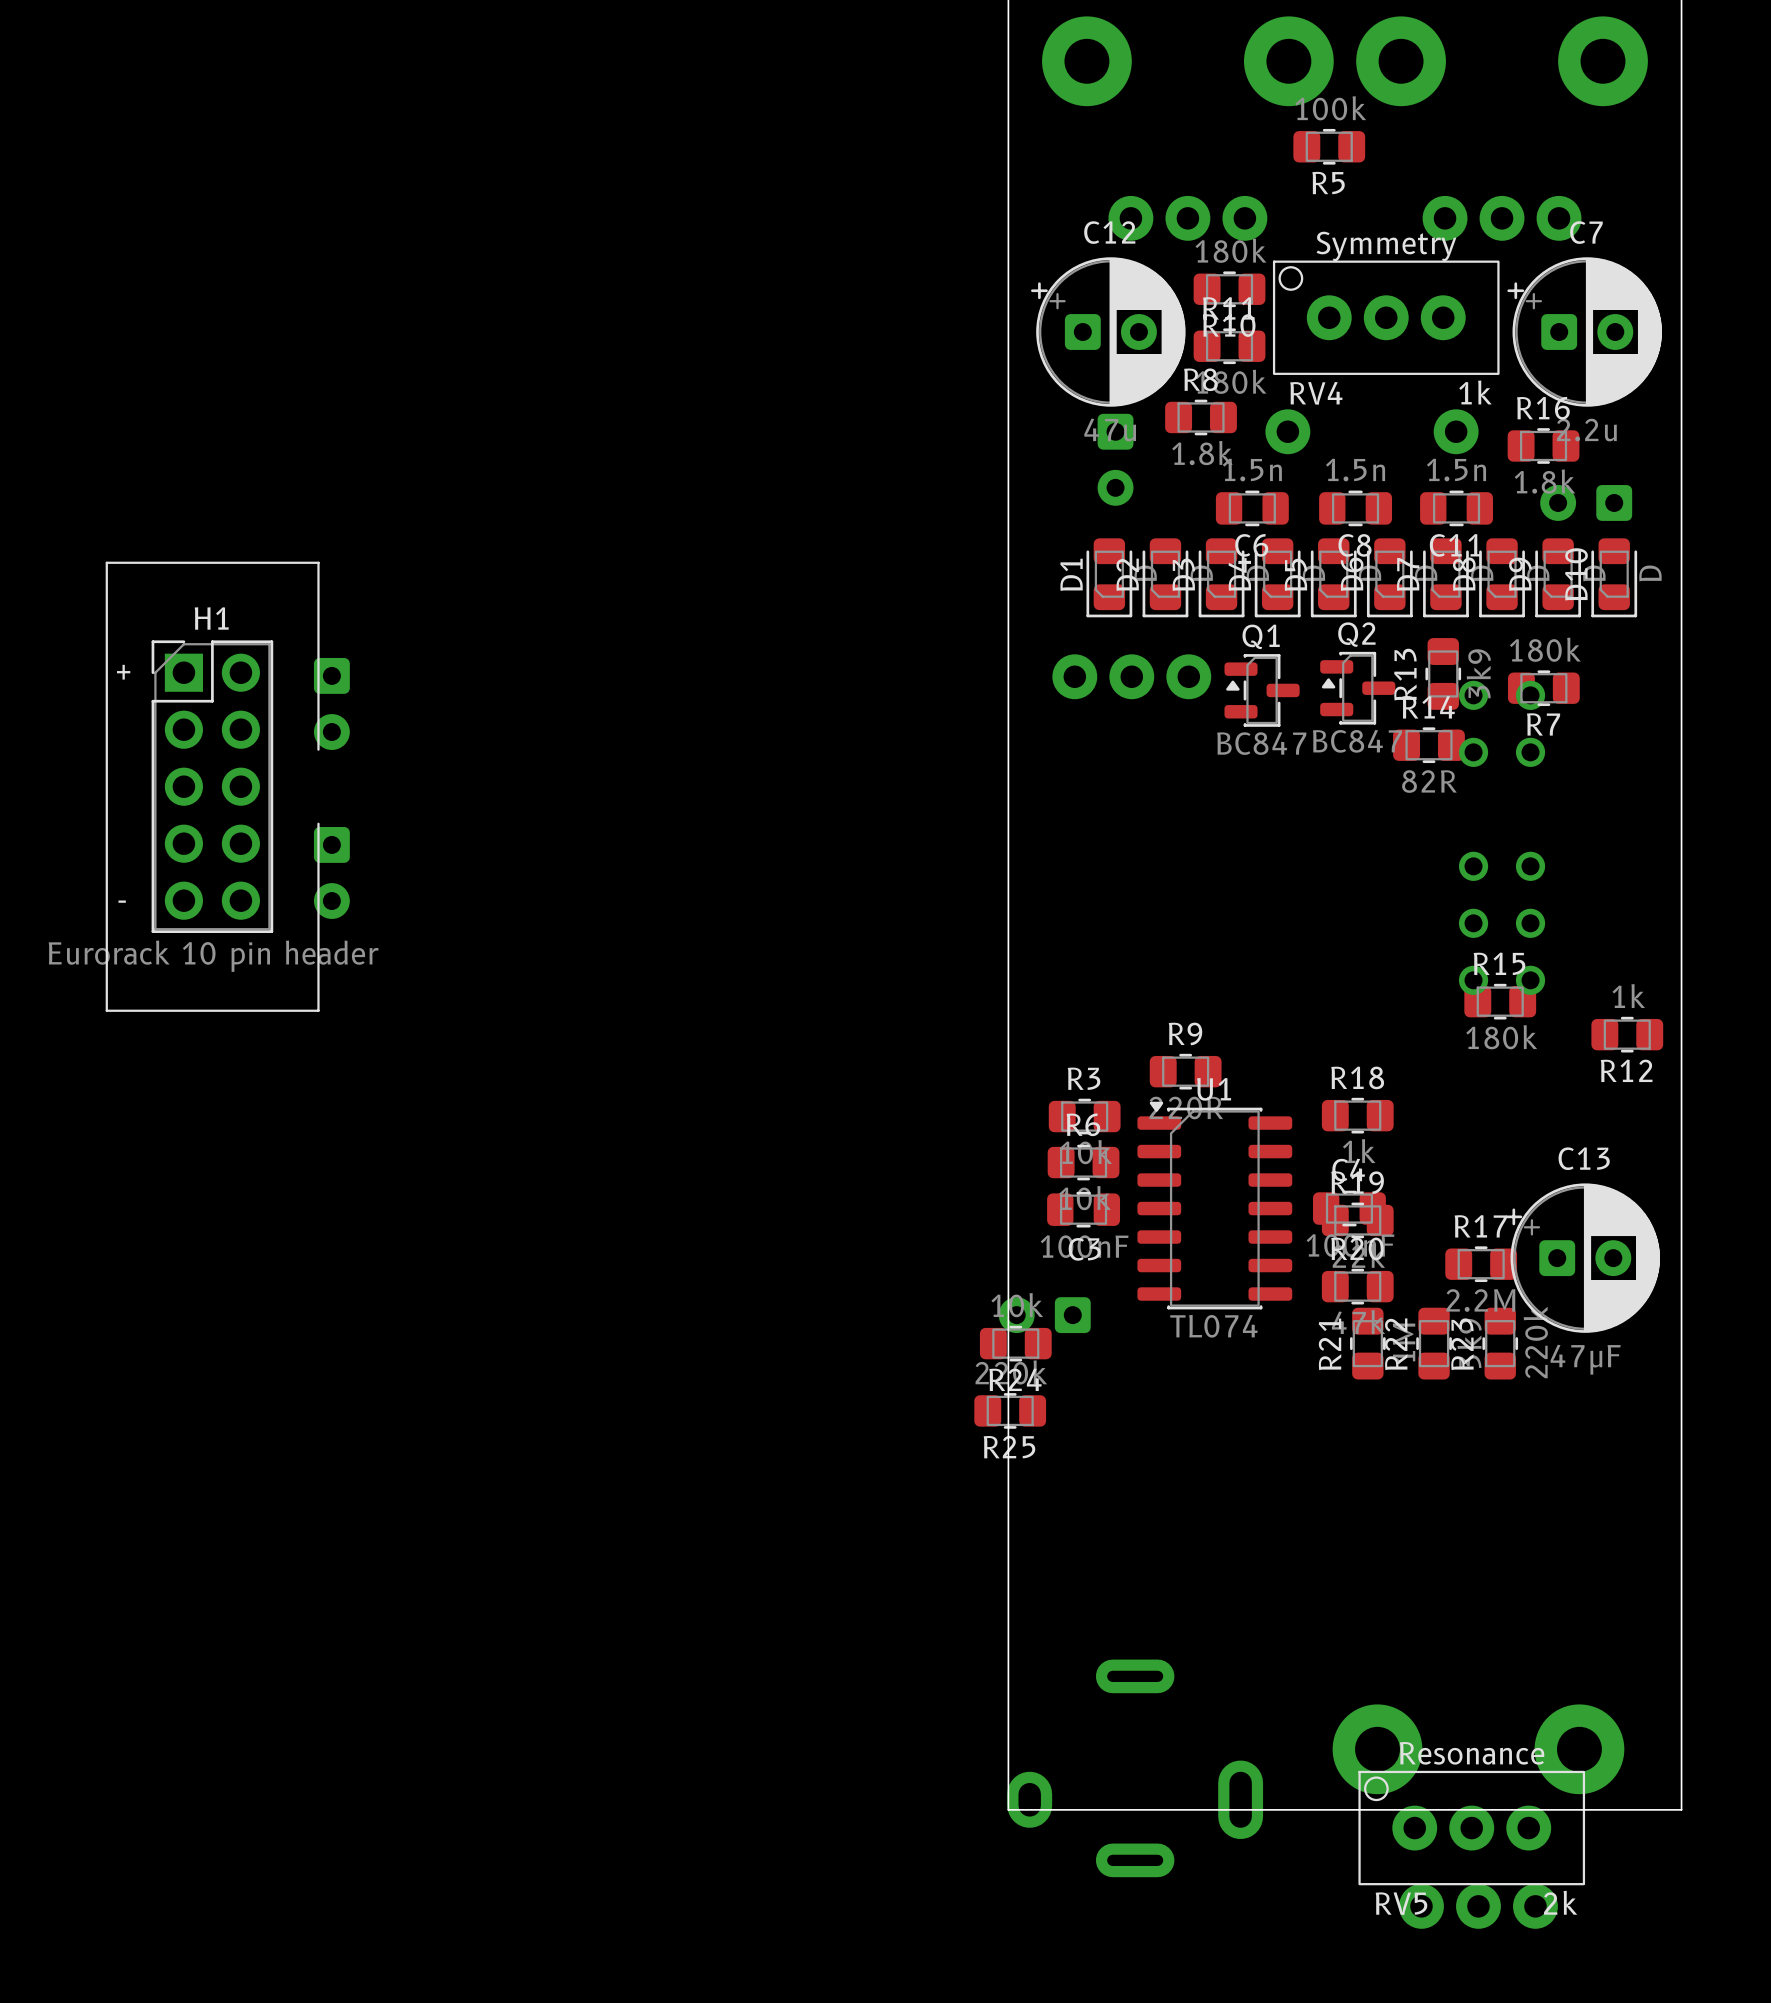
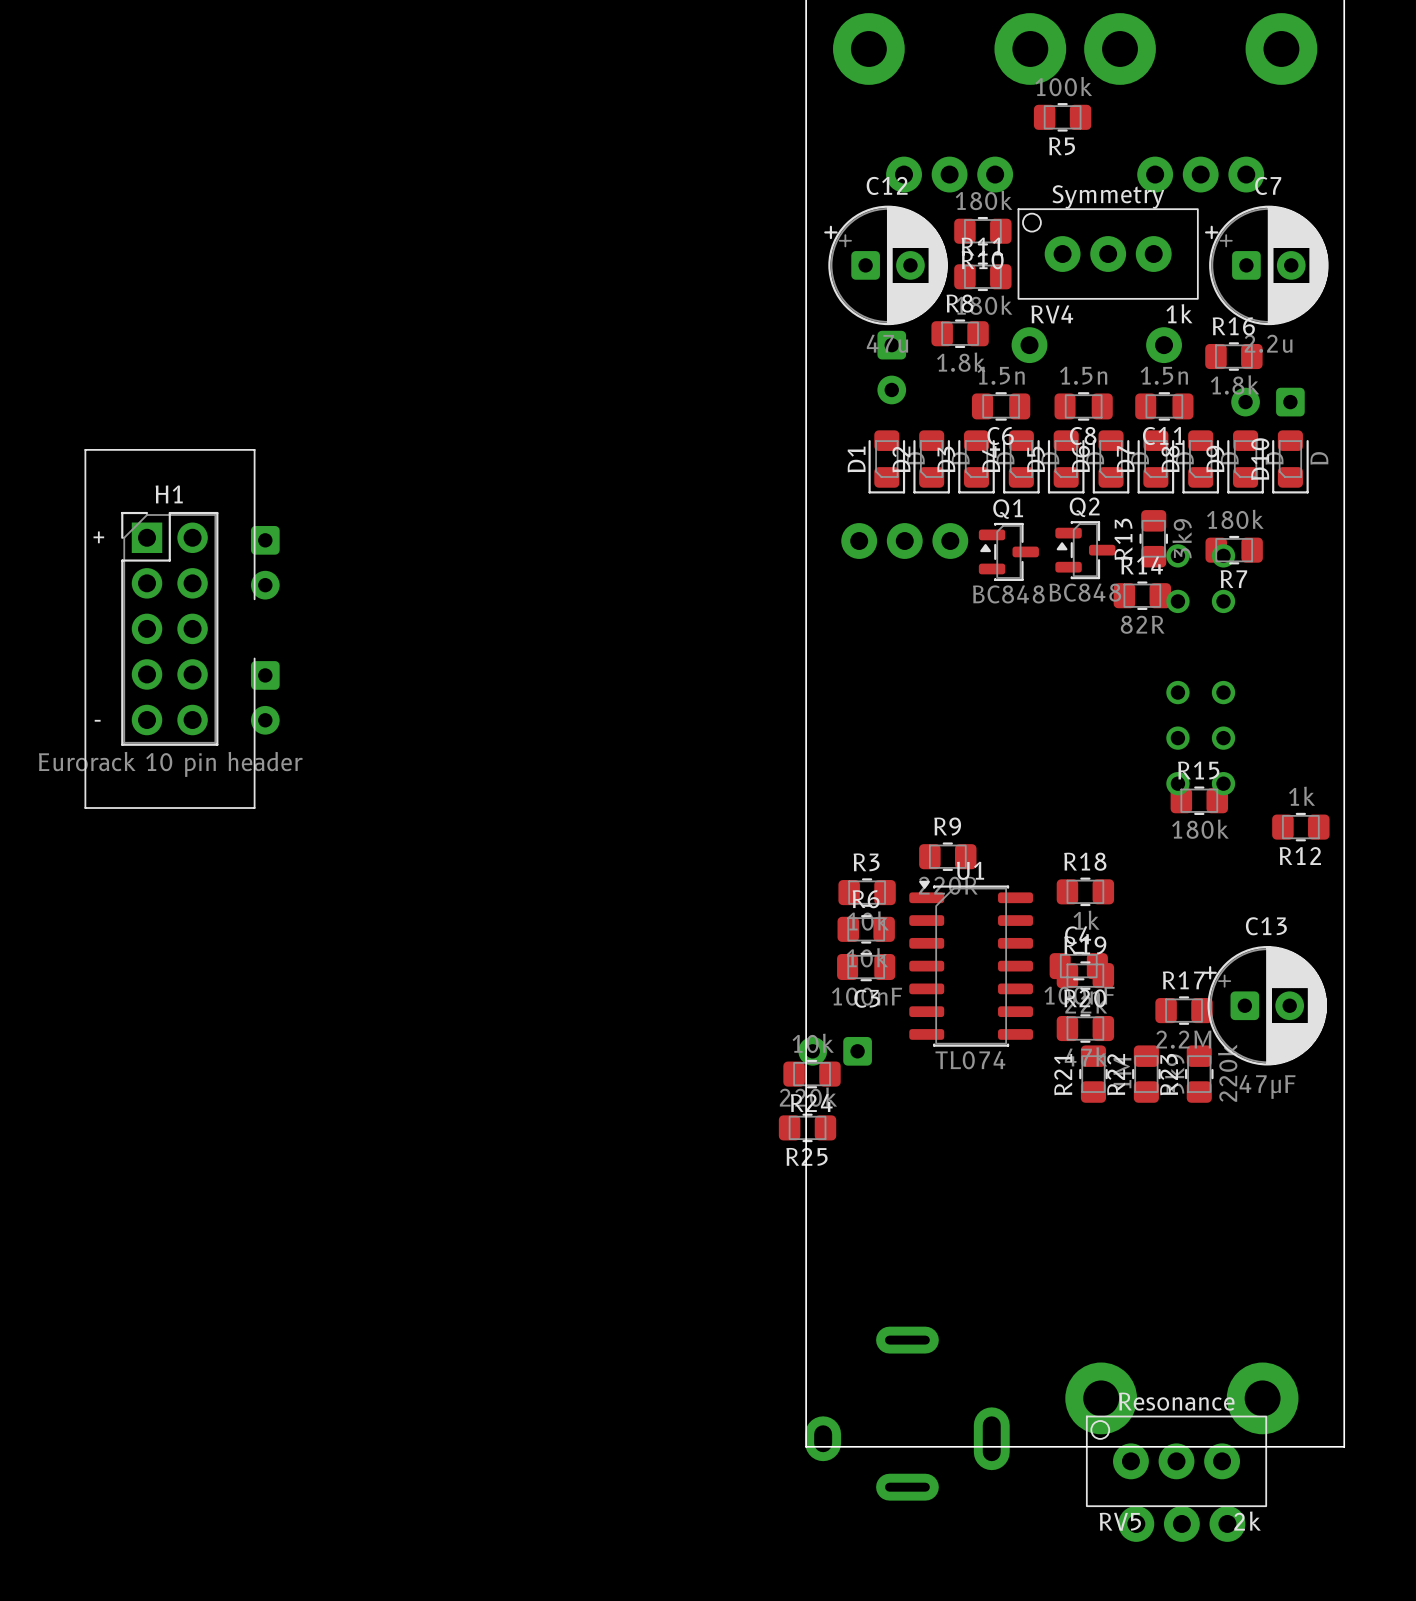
Q2 value: BC847 (1357, 741) -> BC848 (1085, 592)
Q1 value: BC847 (1261, 743) -> BC848 (1008, 594)

